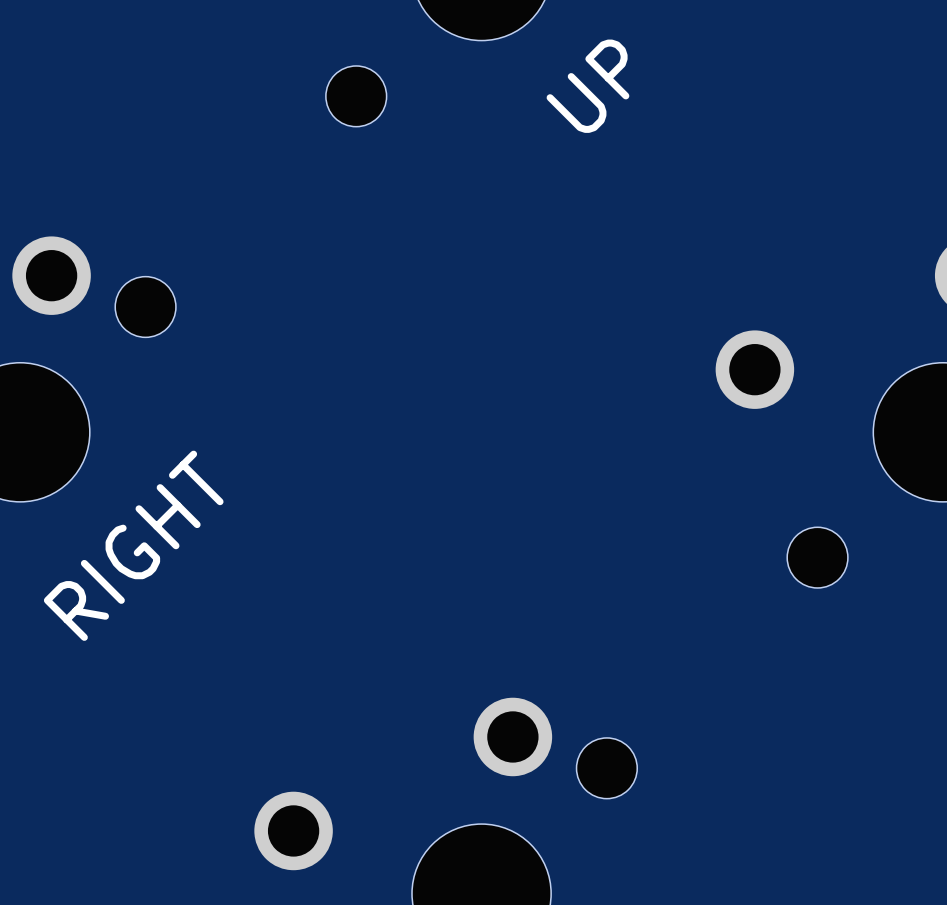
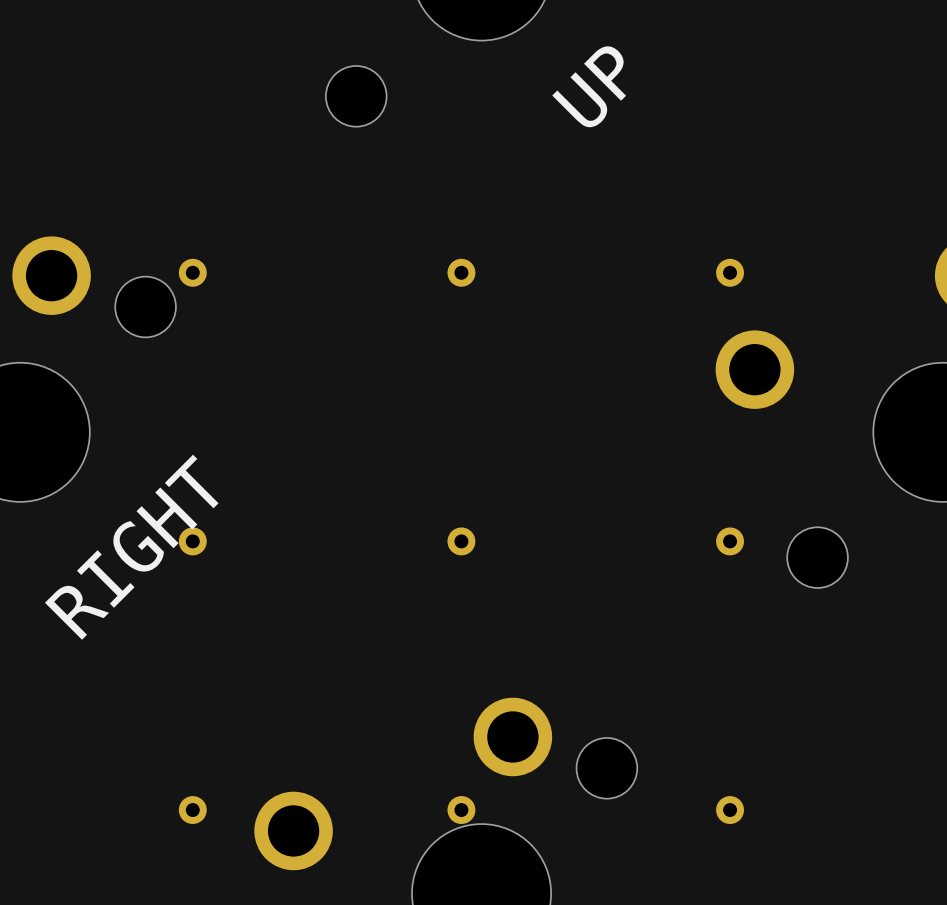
part: none -> (192, 272)
part: none -> (461, 272)
part: none -> (730, 272)
part: none -> (192, 541)
part: none -> (461, 541)
part: none -> (730, 541)
part: none -> (192, 810)
part: none -> (461, 810)
part: none -> (730, 810)

